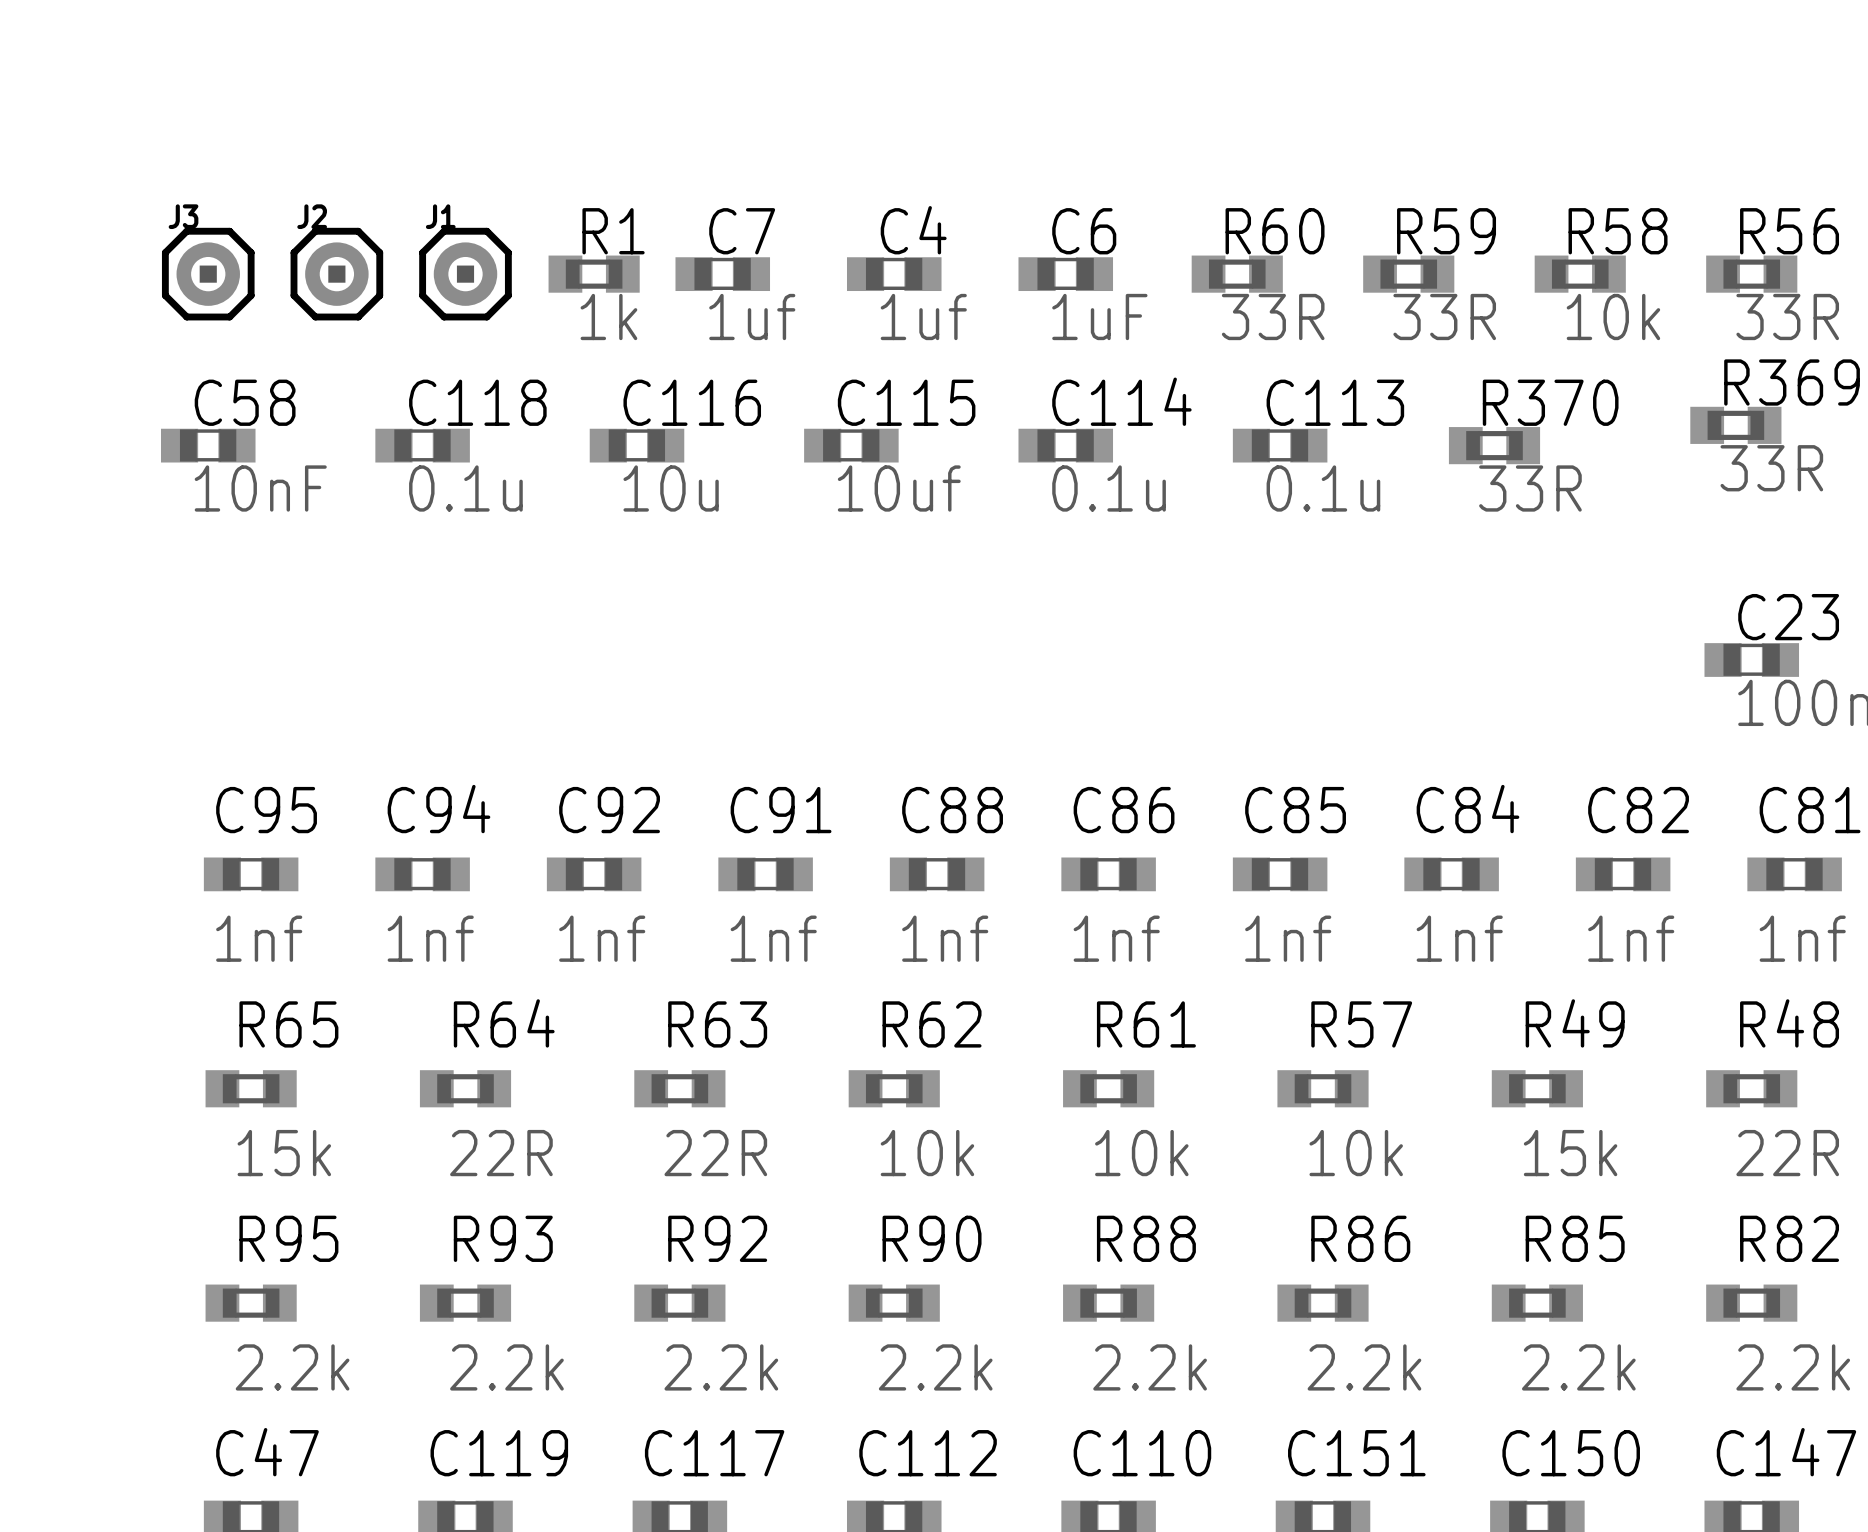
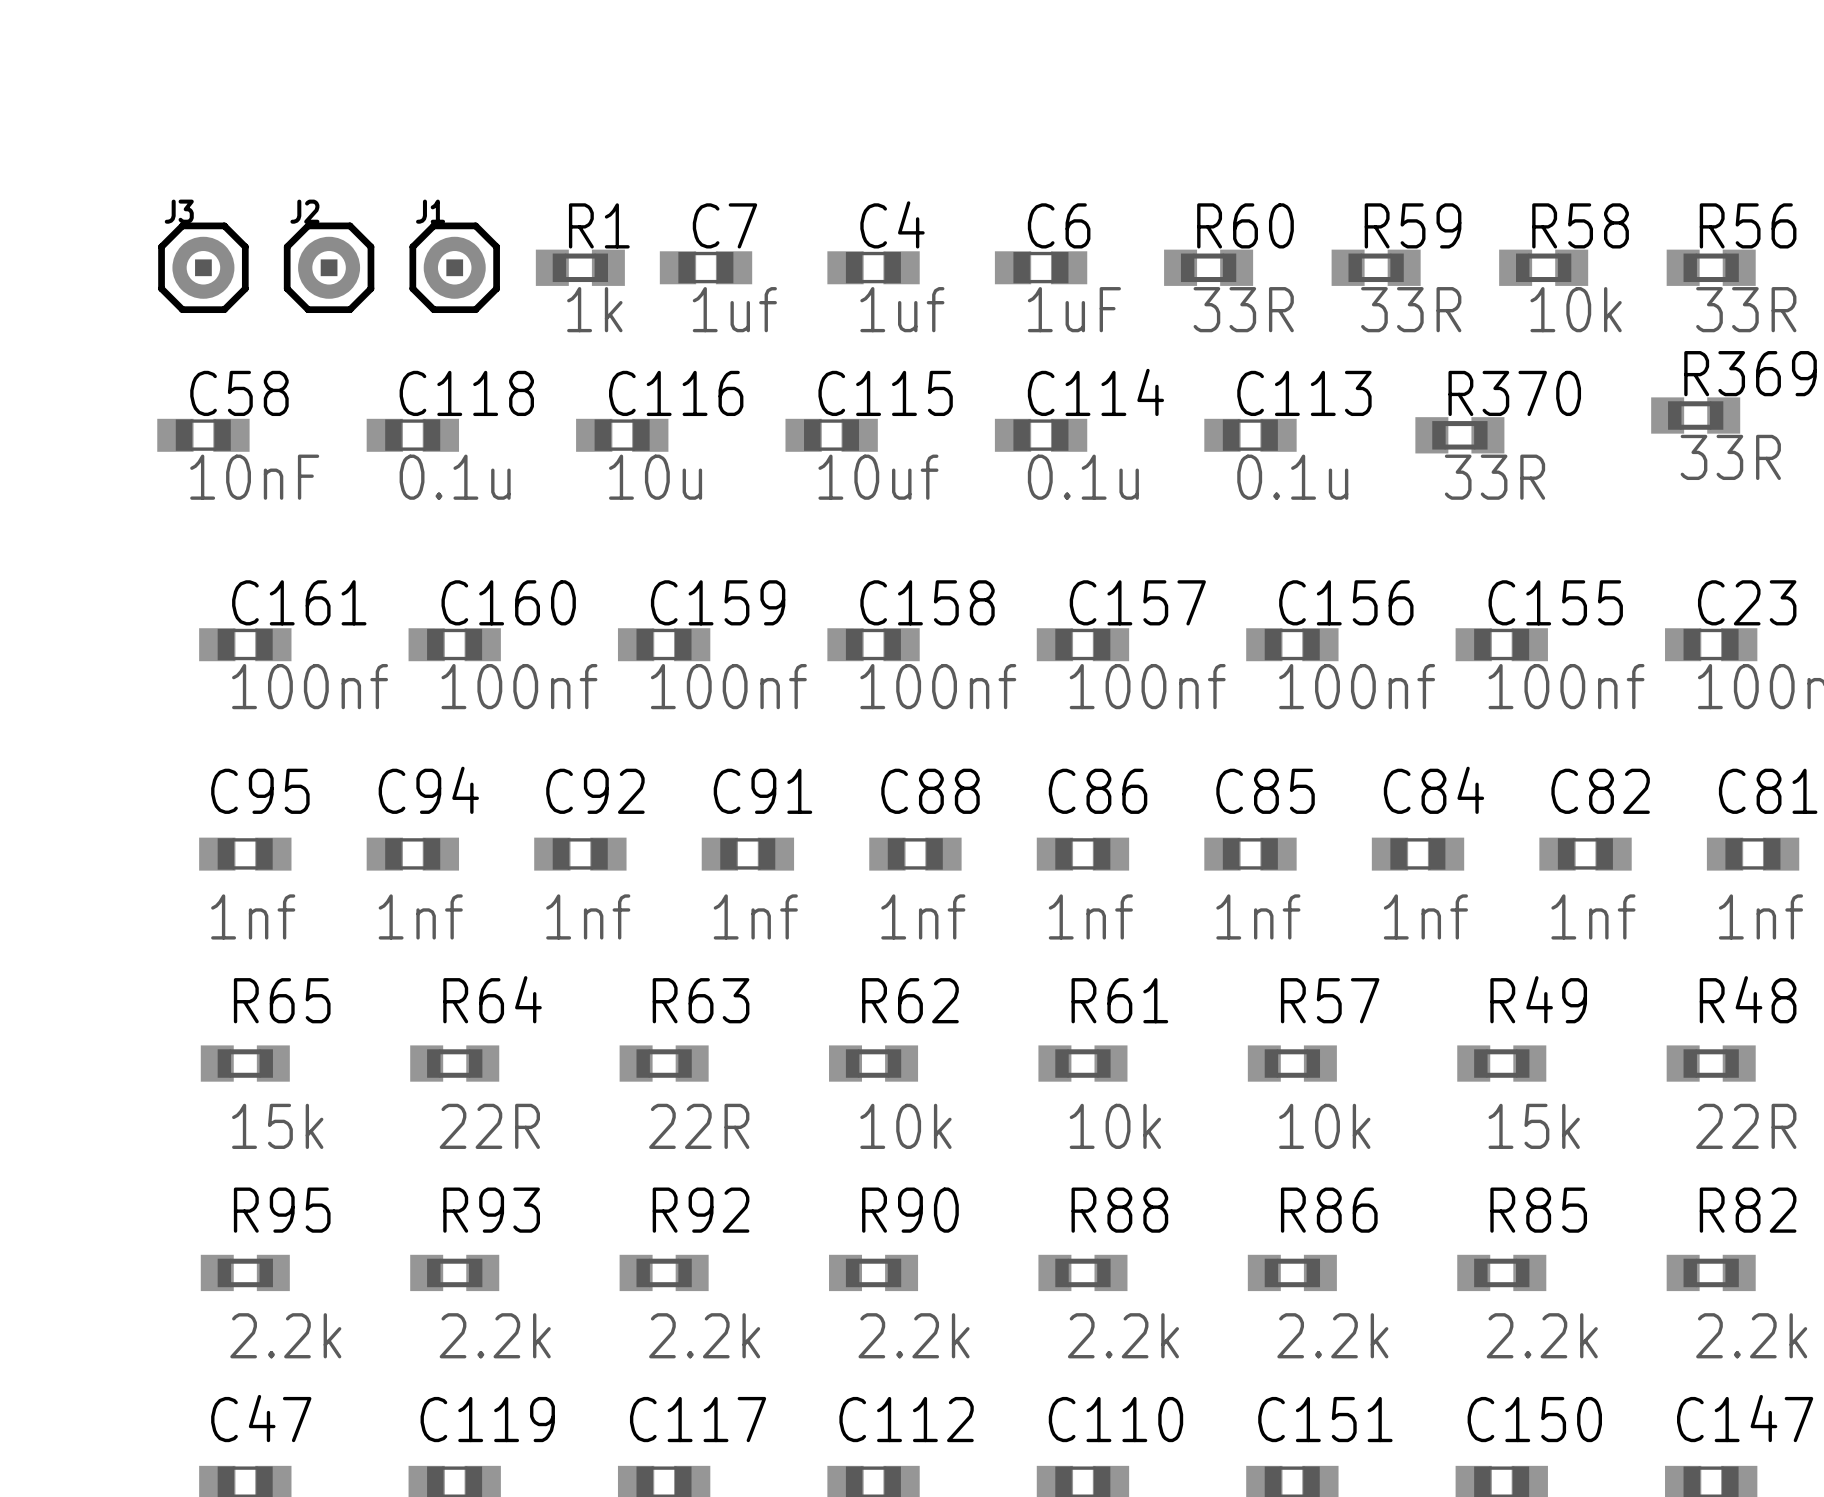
C161: none -> 100nf (245, 644)
C160: none -> 100nf (454, 644)
C159: none -> 100nf (664, 644)
C158: none -> 100nf (873, 644)
C157: none -> 100nf (1082, 644)
C156: none -> 100nf (1292, 644)
C155: none -> 100nf (1501, 644)

